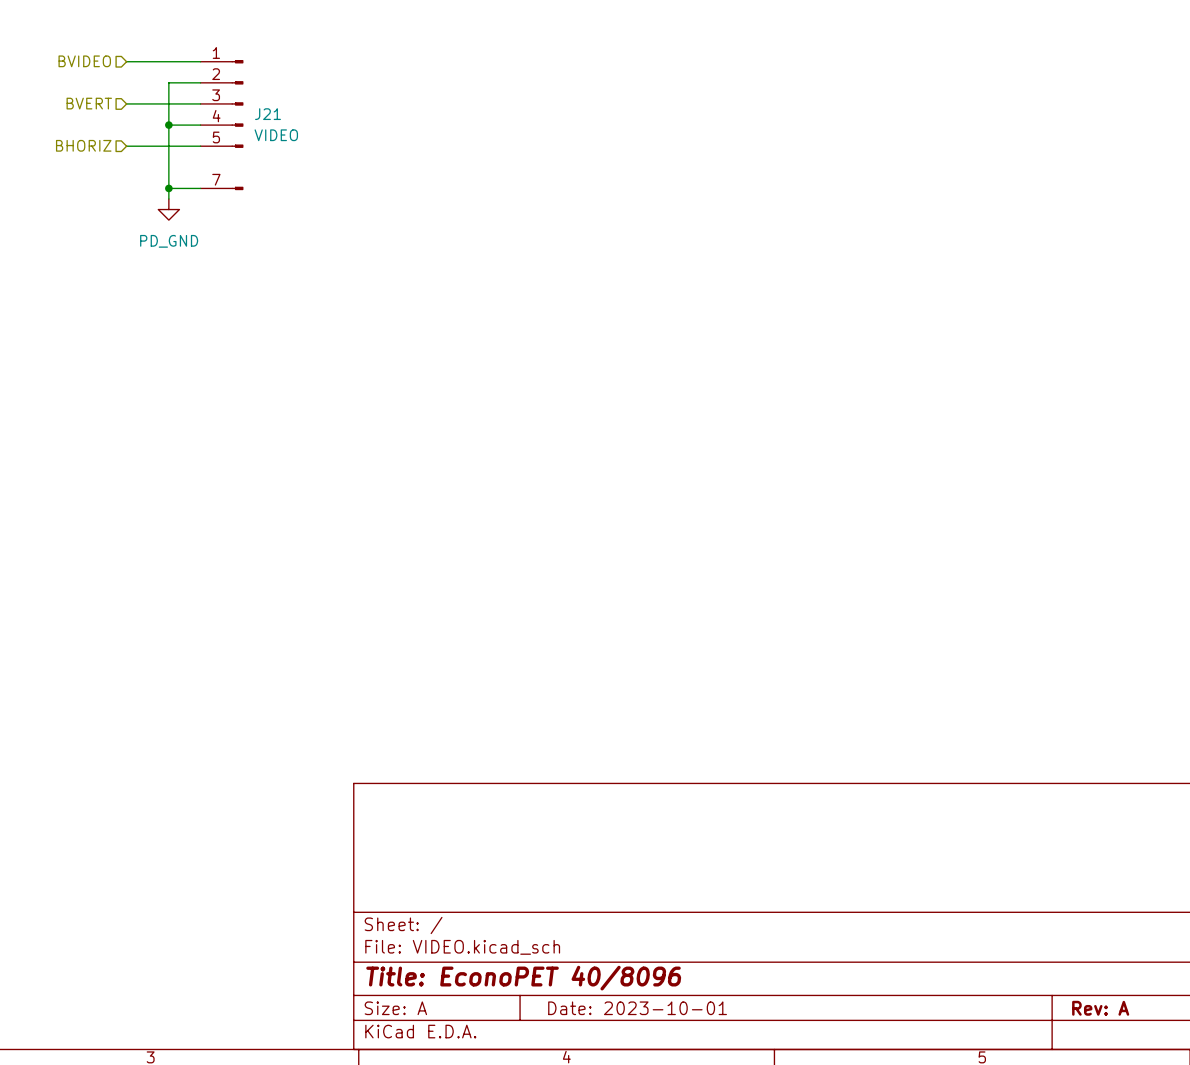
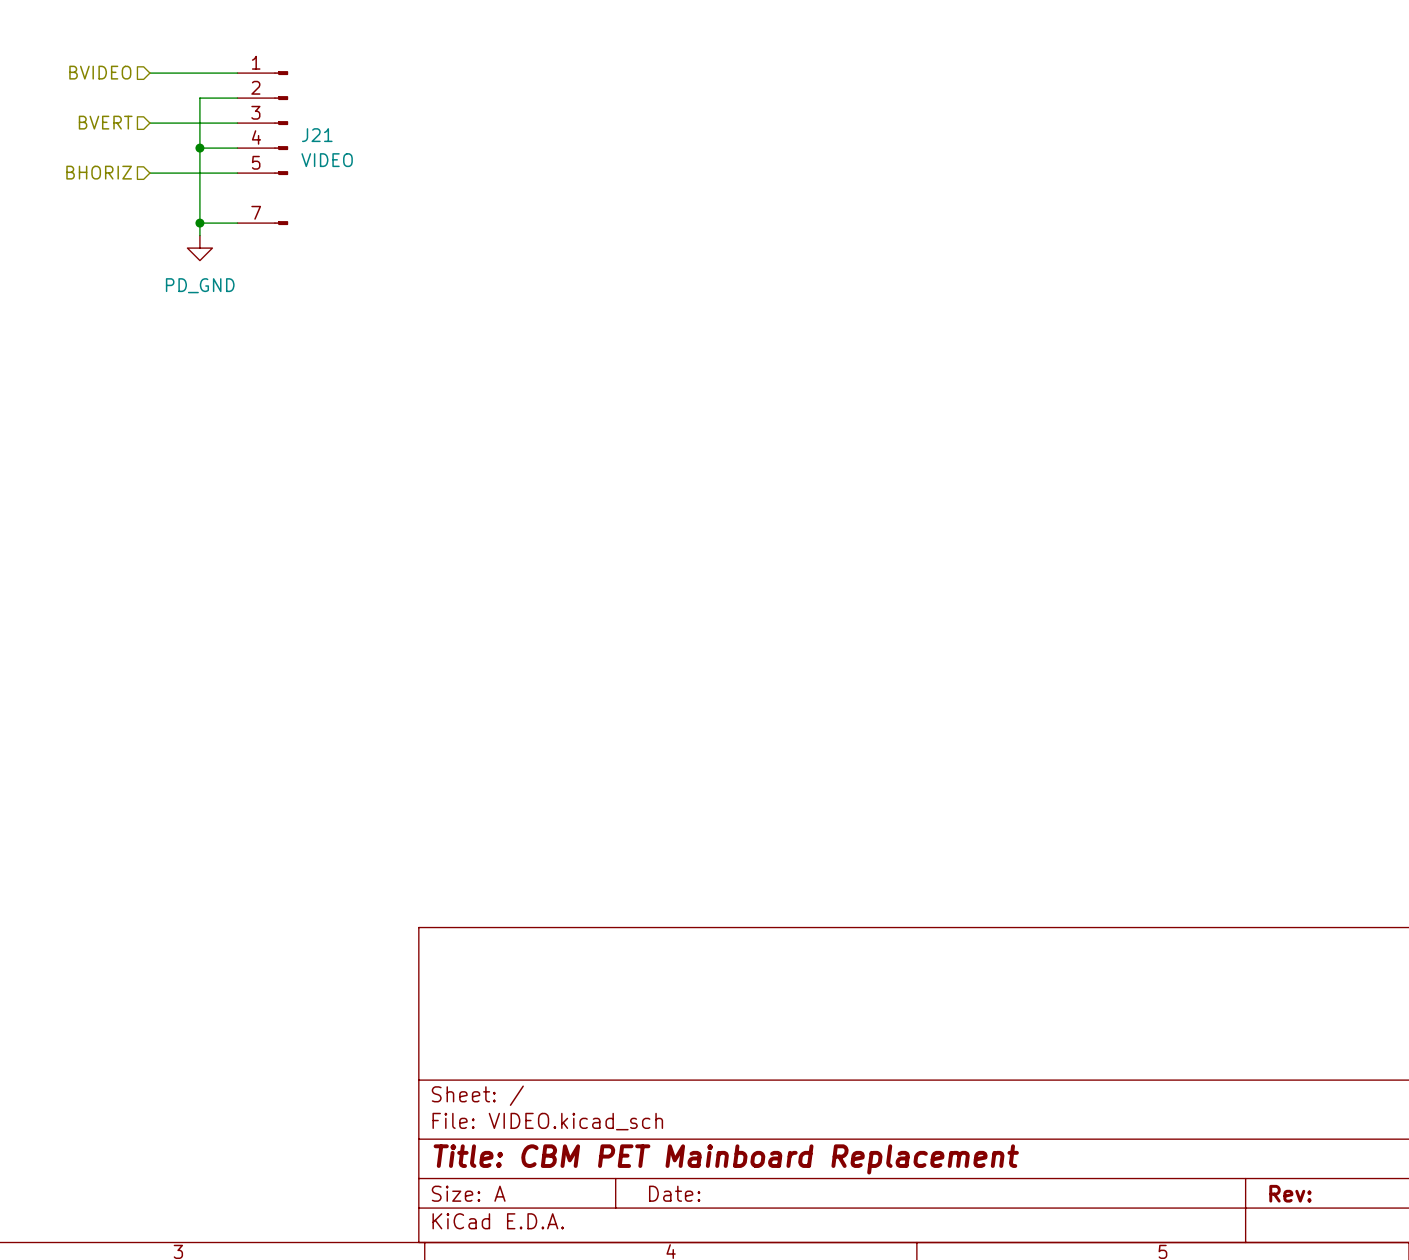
title block: Title: EconoPET 40/8096 (523, 978) -> Title: CBM PET Mainboard Replacement (726, 1159)
title block: Date: 2023-10-01 (637, 1008) -> Date: (674, 1193)
title block: Rev: A (1100, 1008) -> Rev: (1290, 1193)

